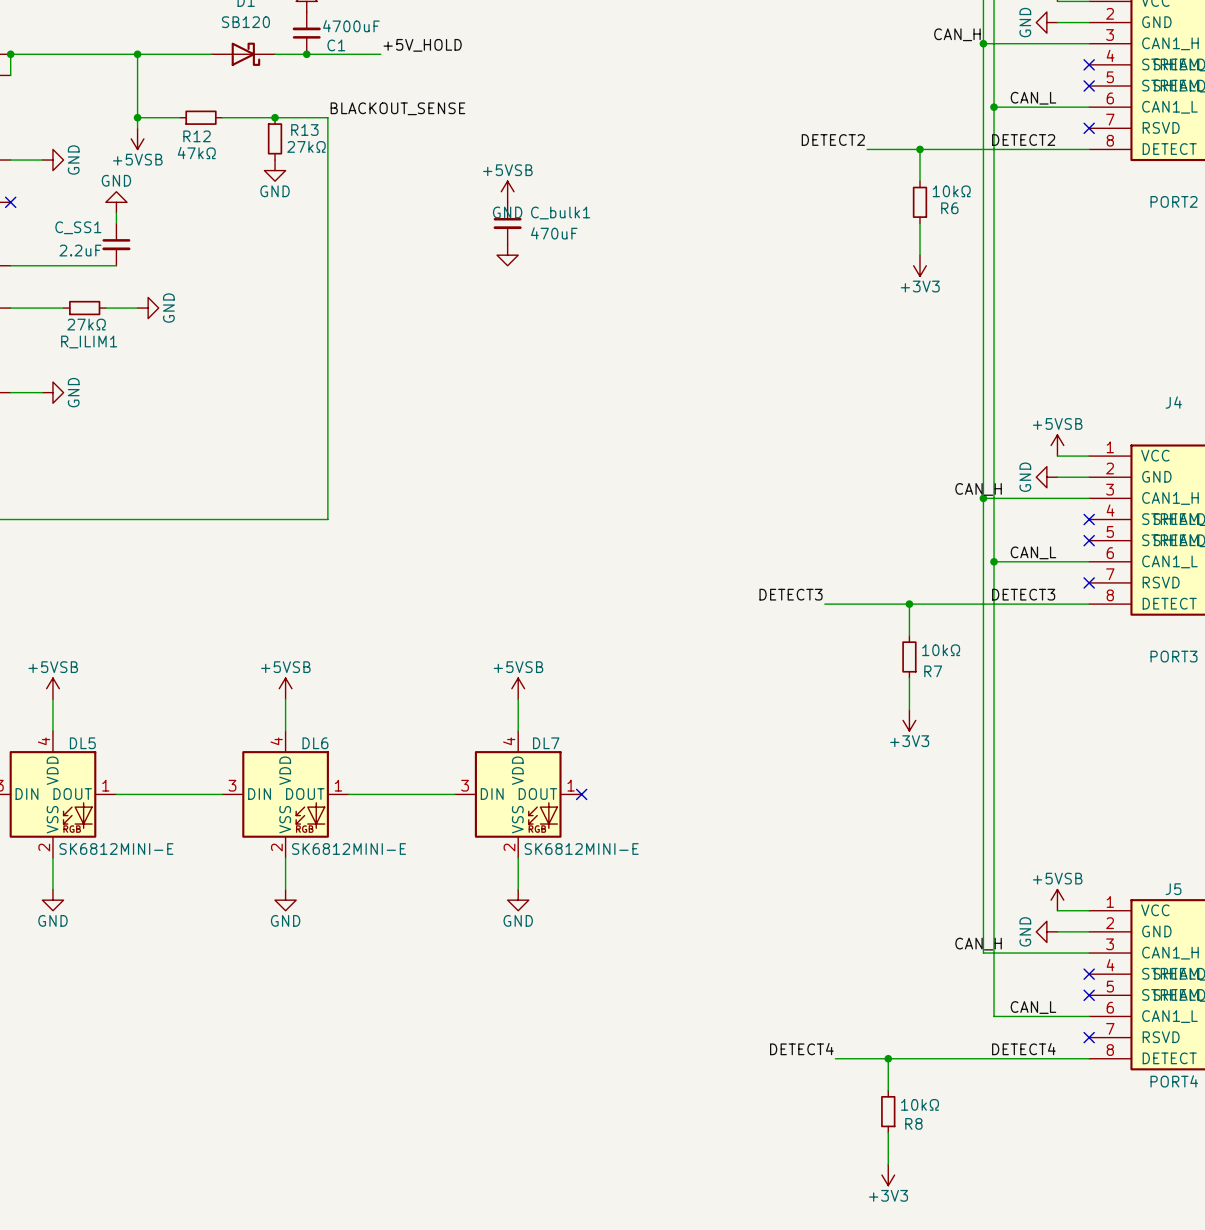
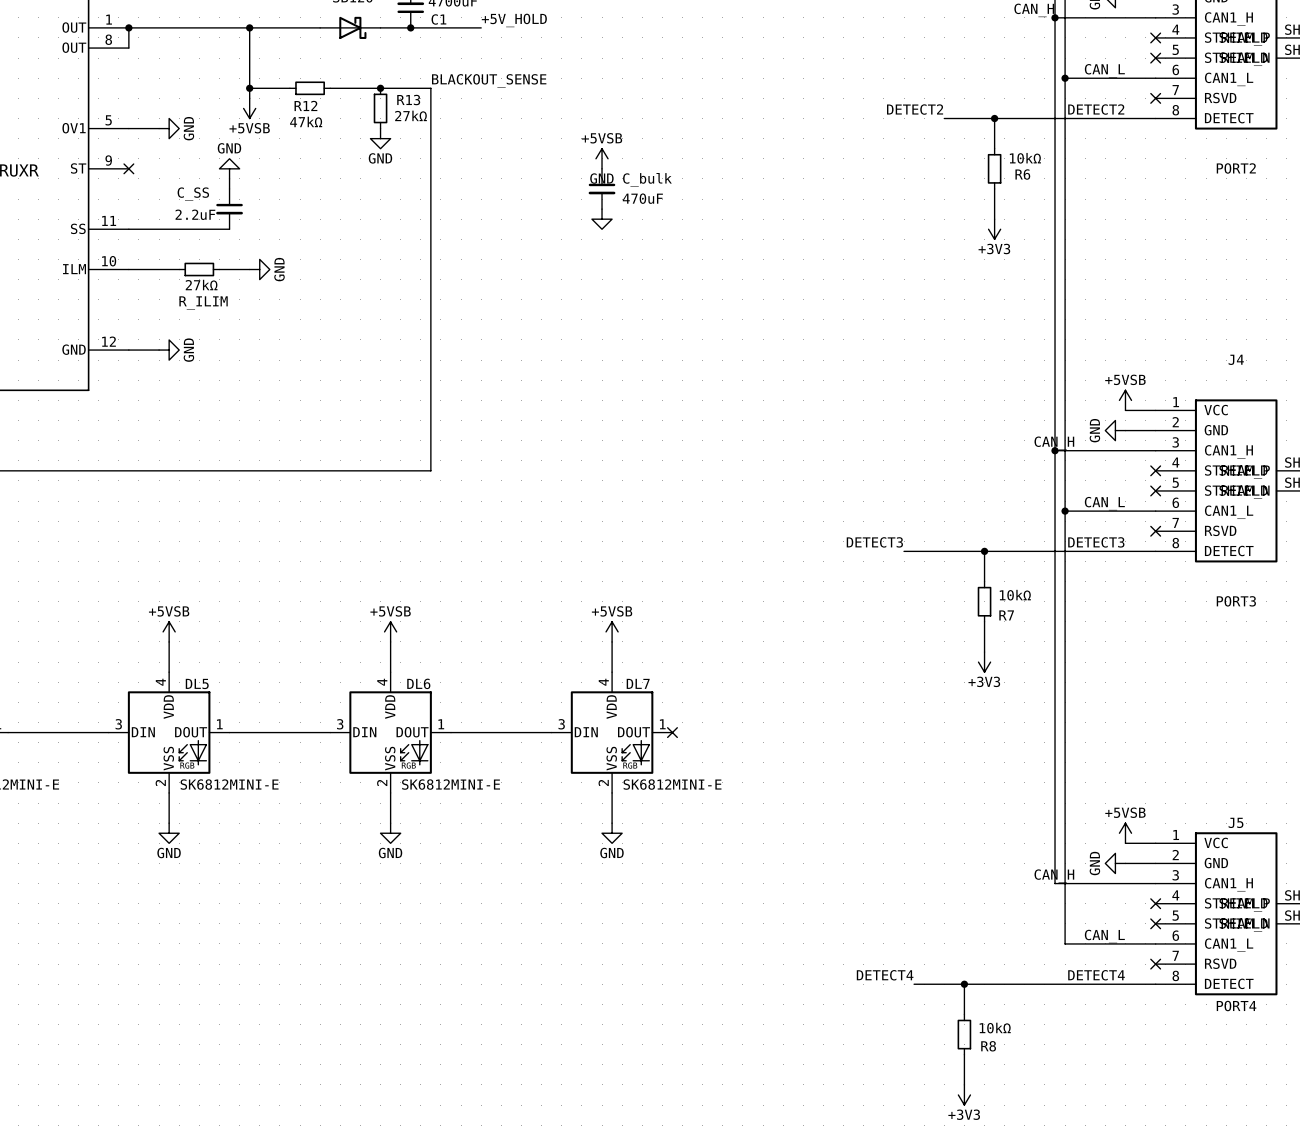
C_bulk1 name: C_bulk1 (560, 212) -> C_bulk (647, 179)
C_SS1 name: C_SS1 (78, 227) -> C_SS (193, 194)
R_ILIM1 name: R_ILIM1 (89, 341) -> R_ILIM (203, 302)

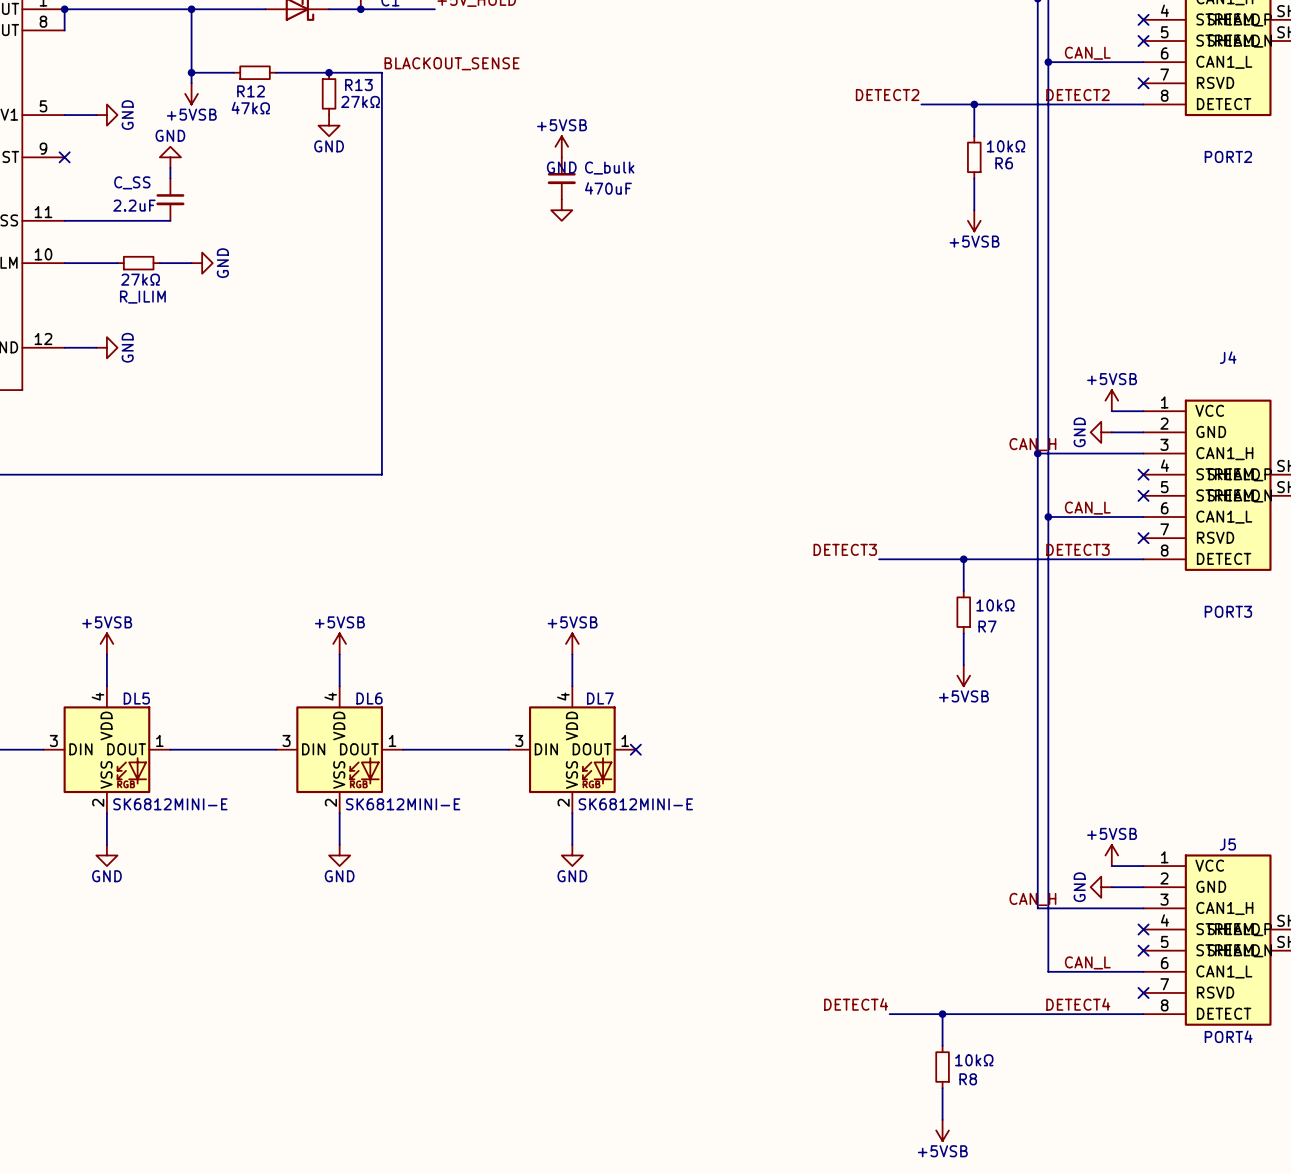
power symbol: +3V3 (994, 229) -> +5VSB (974, 220)
power symbol: +3V3 (984, 662) -> +5VSB (963, 675)
power symbol: +3V3 (964, 1094) -> +5VSB (942, 1130)

